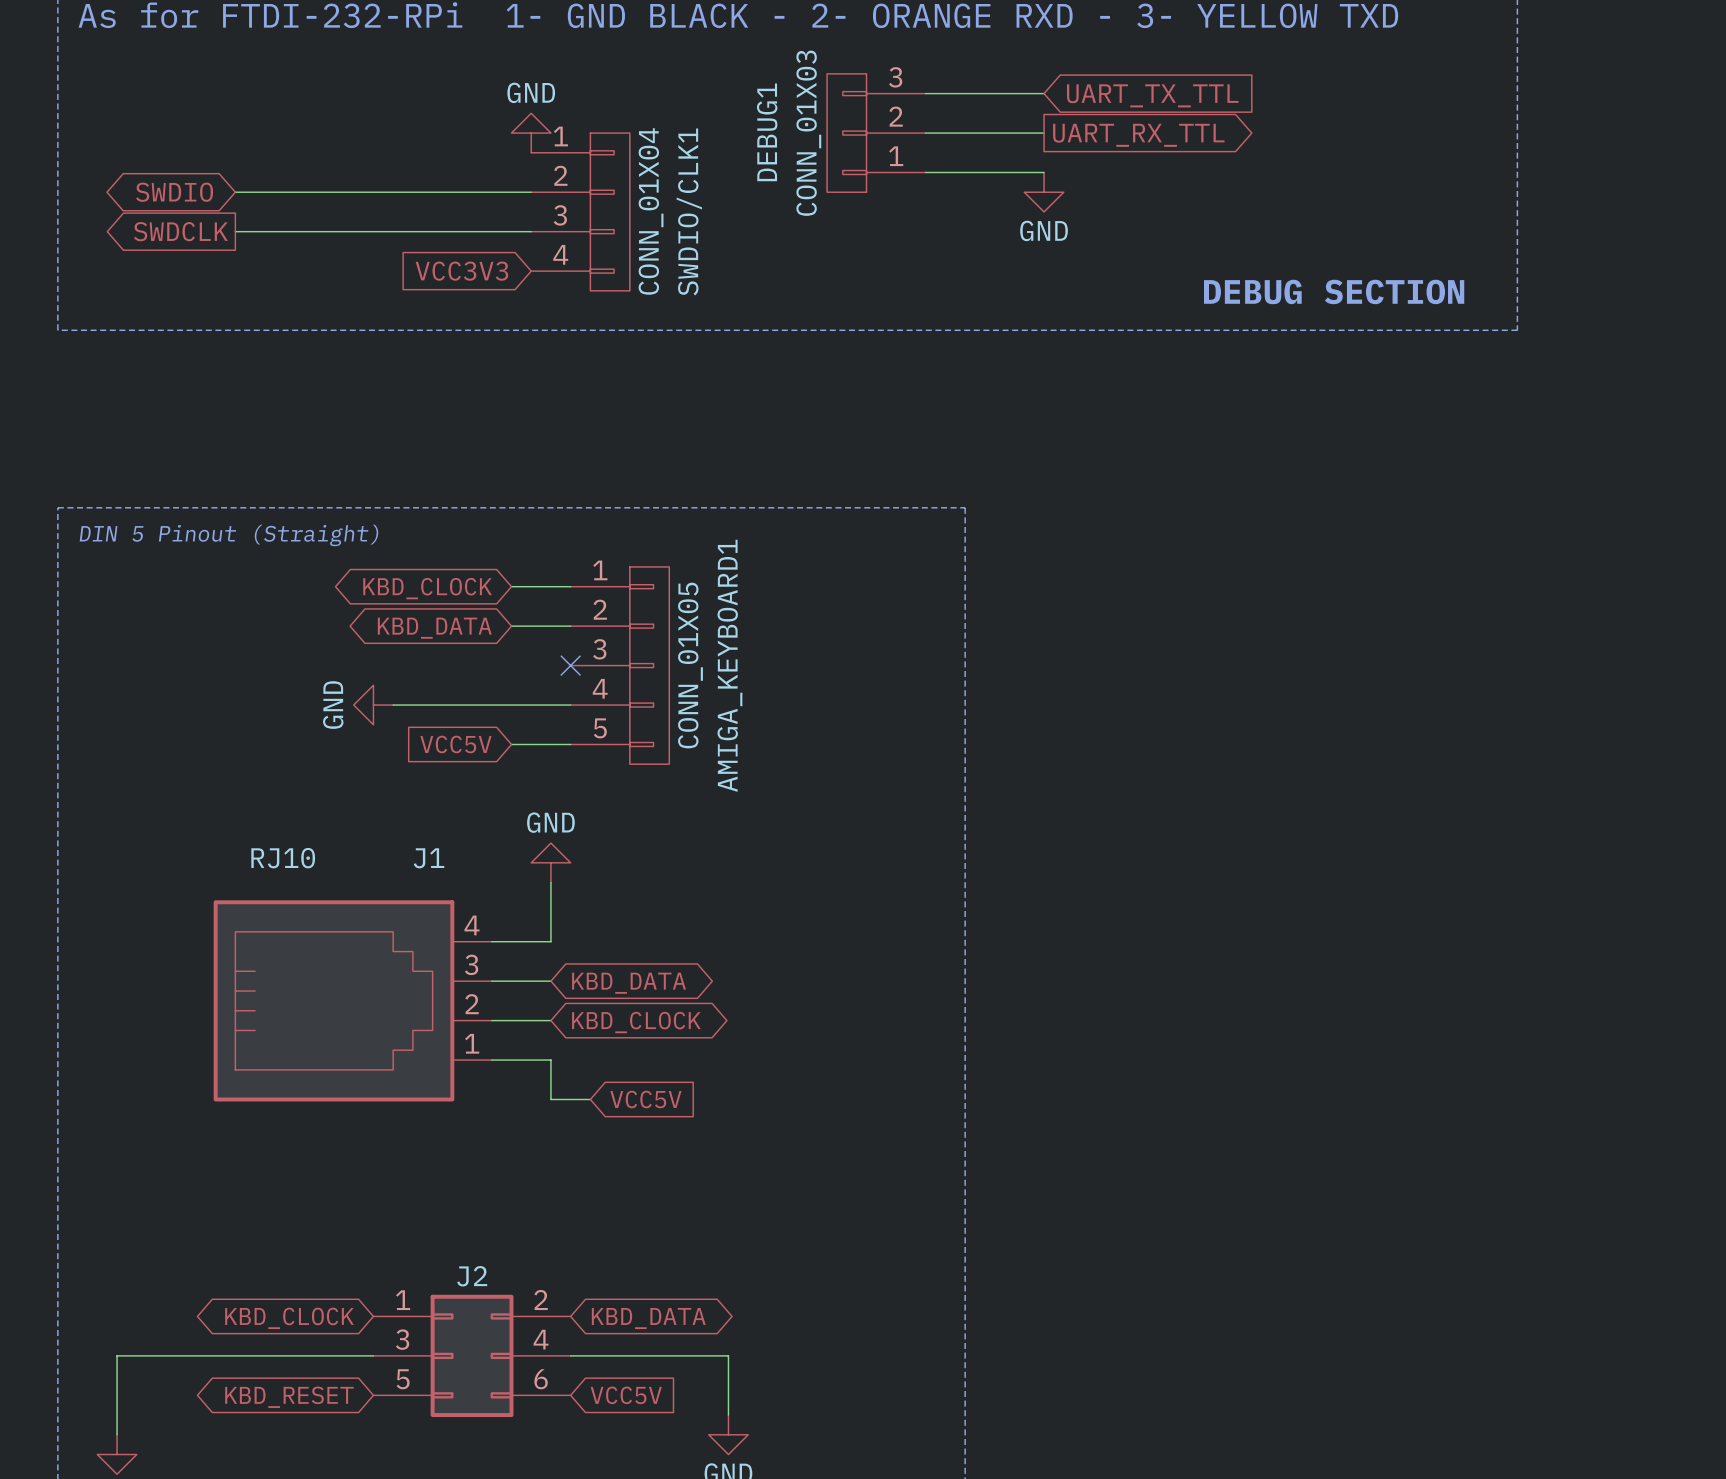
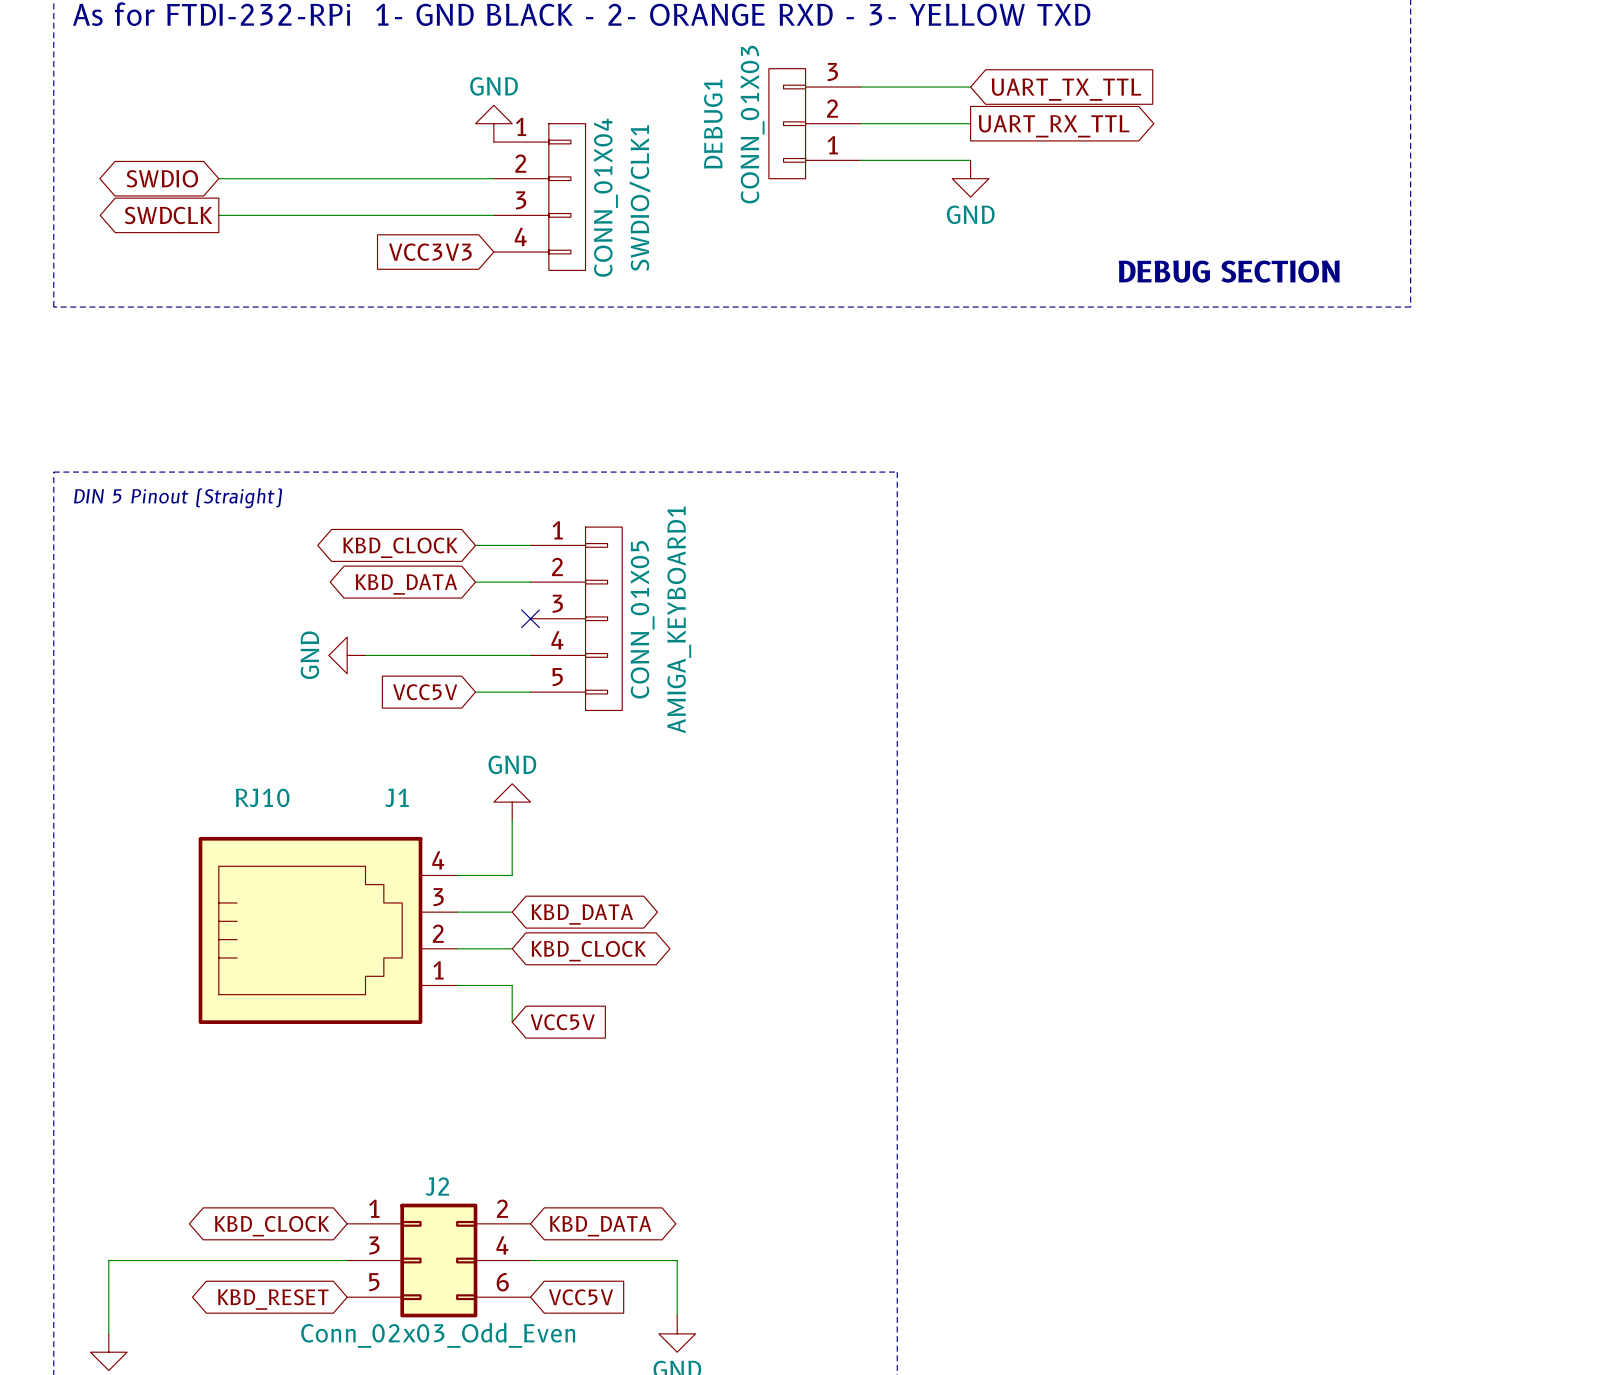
wire: (550, 1099) (590, 1099) -> none
global label position: VCC5V (645, 1099) -> VCC5V (562, 1022)
J2 value: none -> Conn_02x03_Odd_Even (438, 1335)

